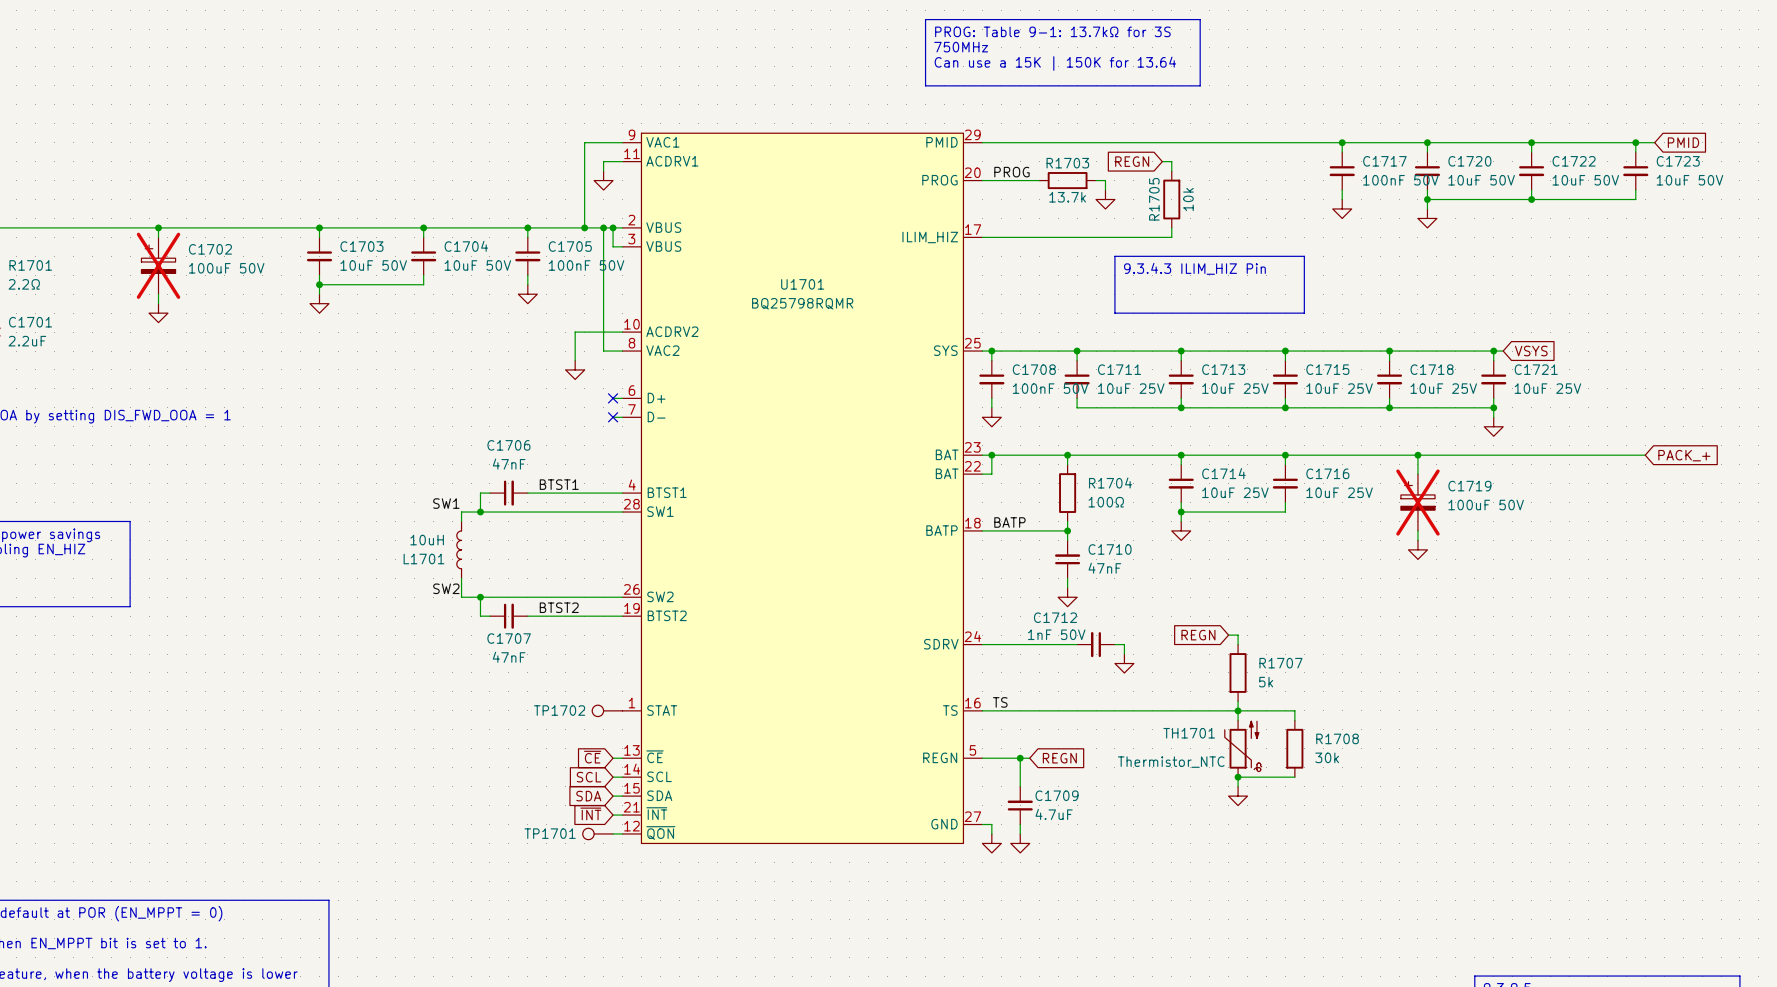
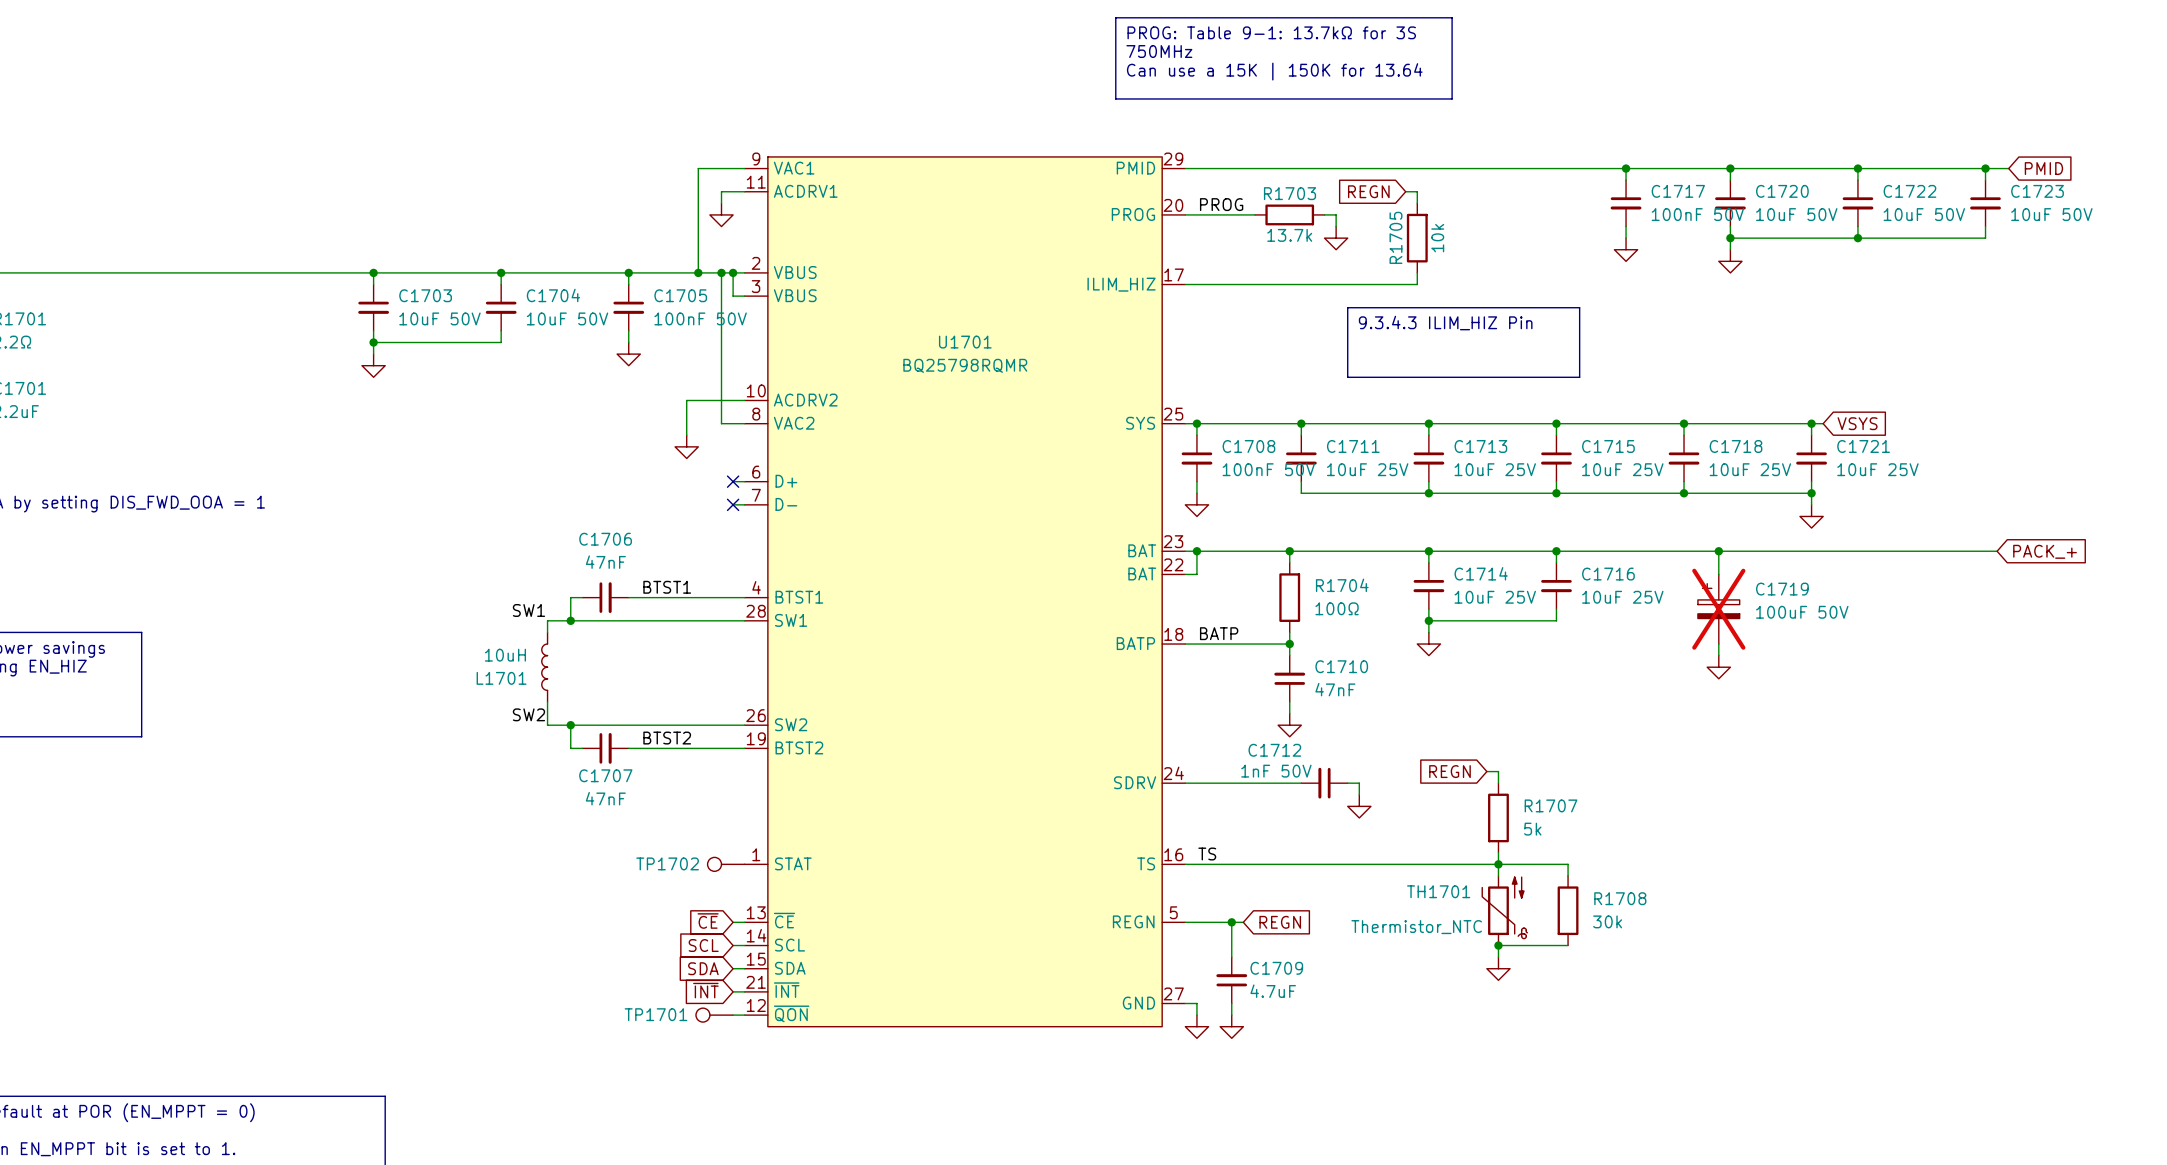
wire: (158, 227) (158, 237) -> none
junction: (158, 227) -> none
C1702: 100uF 50V (158, 265) -> none
wire: (158, 294) (158, 303) -> none
power symbol: (158, 313) -> none

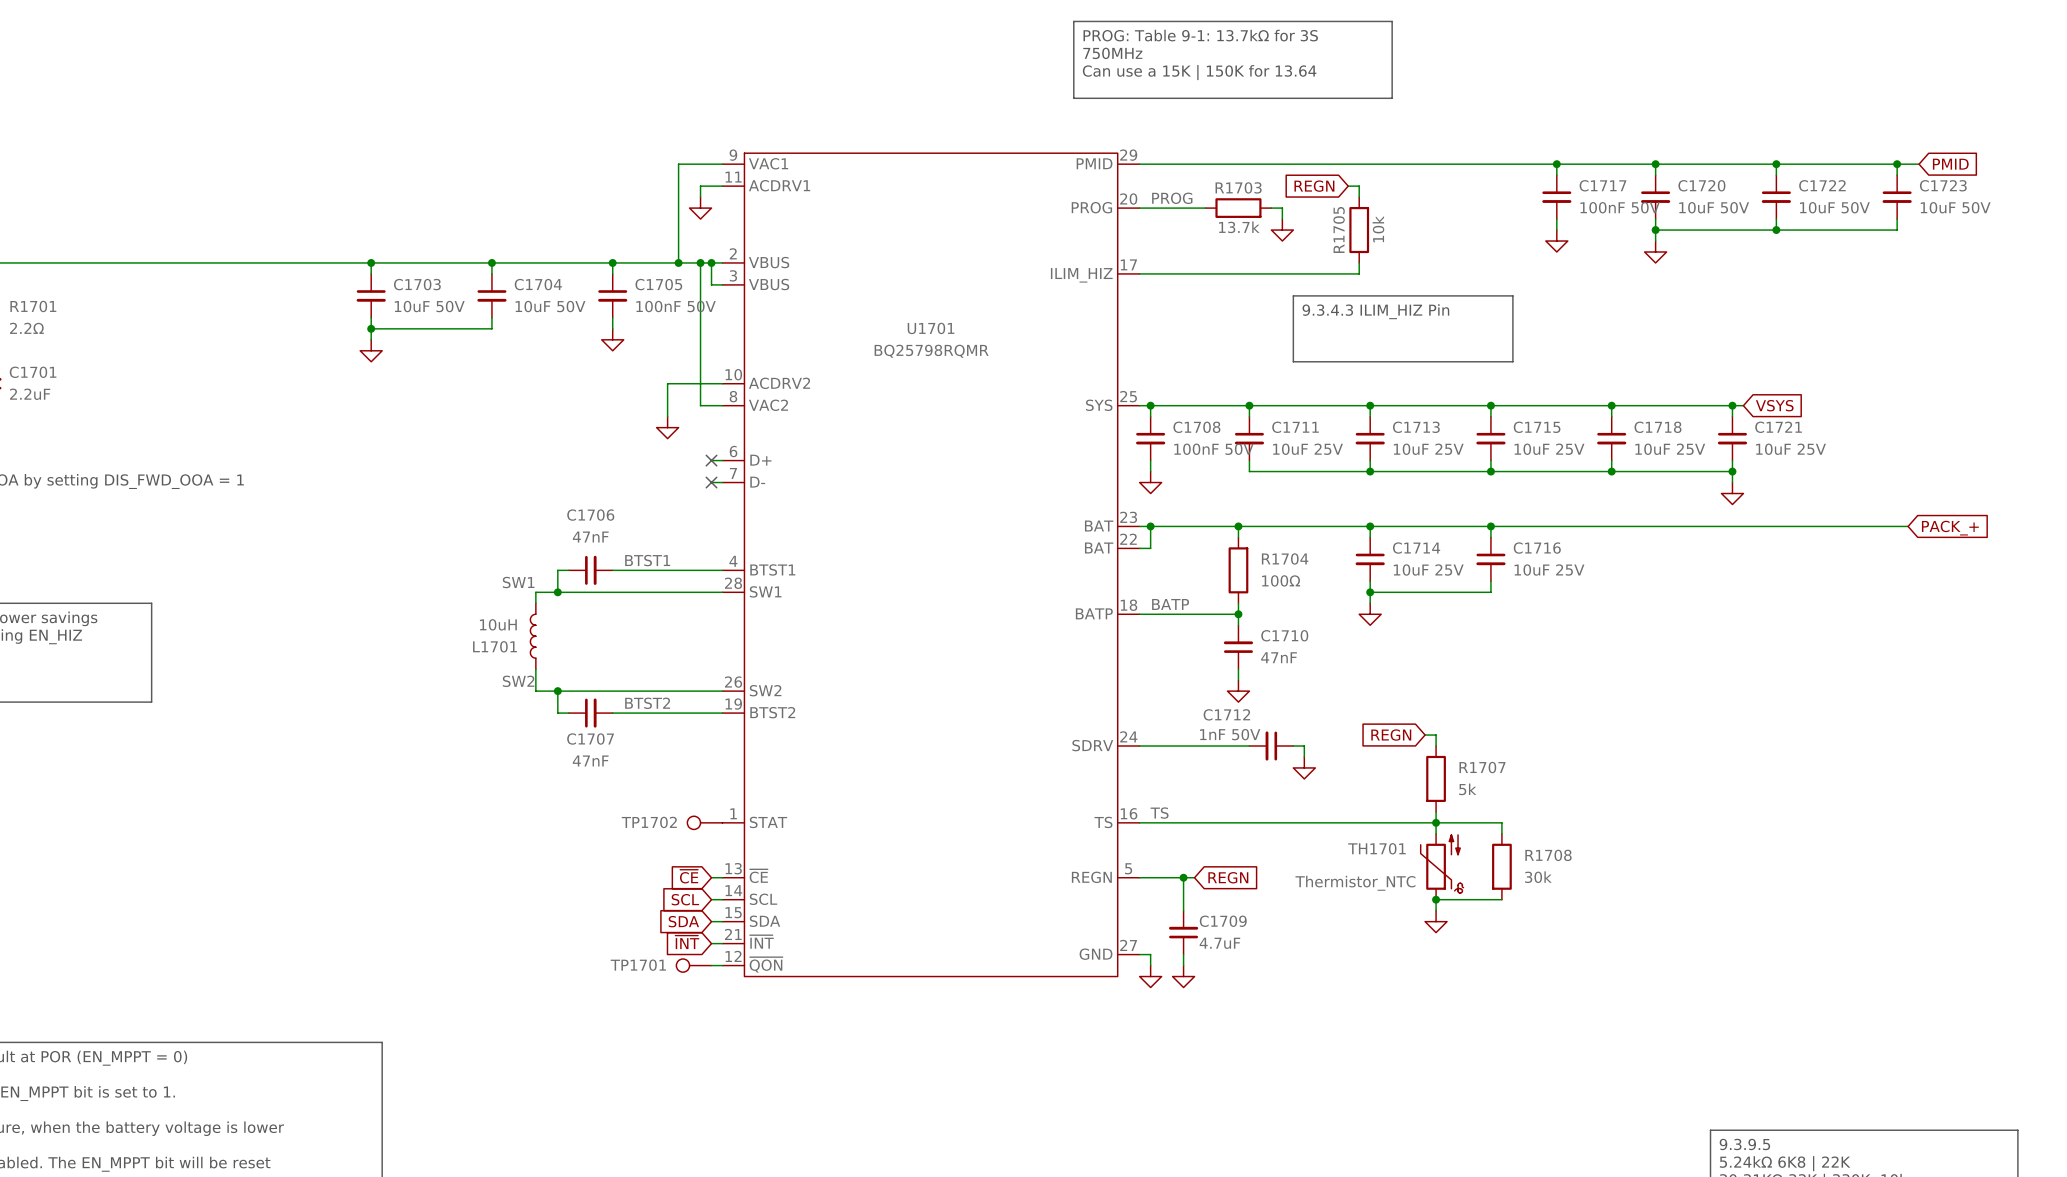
wire: (1718, 551) (1718, 574) -> none
junction: (1718, 551) -> none
C1719: 100uF 50V (1718, 609) -> none
wire: (1718, 644) (1718, 655) -> none
power symbol: (1718, 667) -> none

